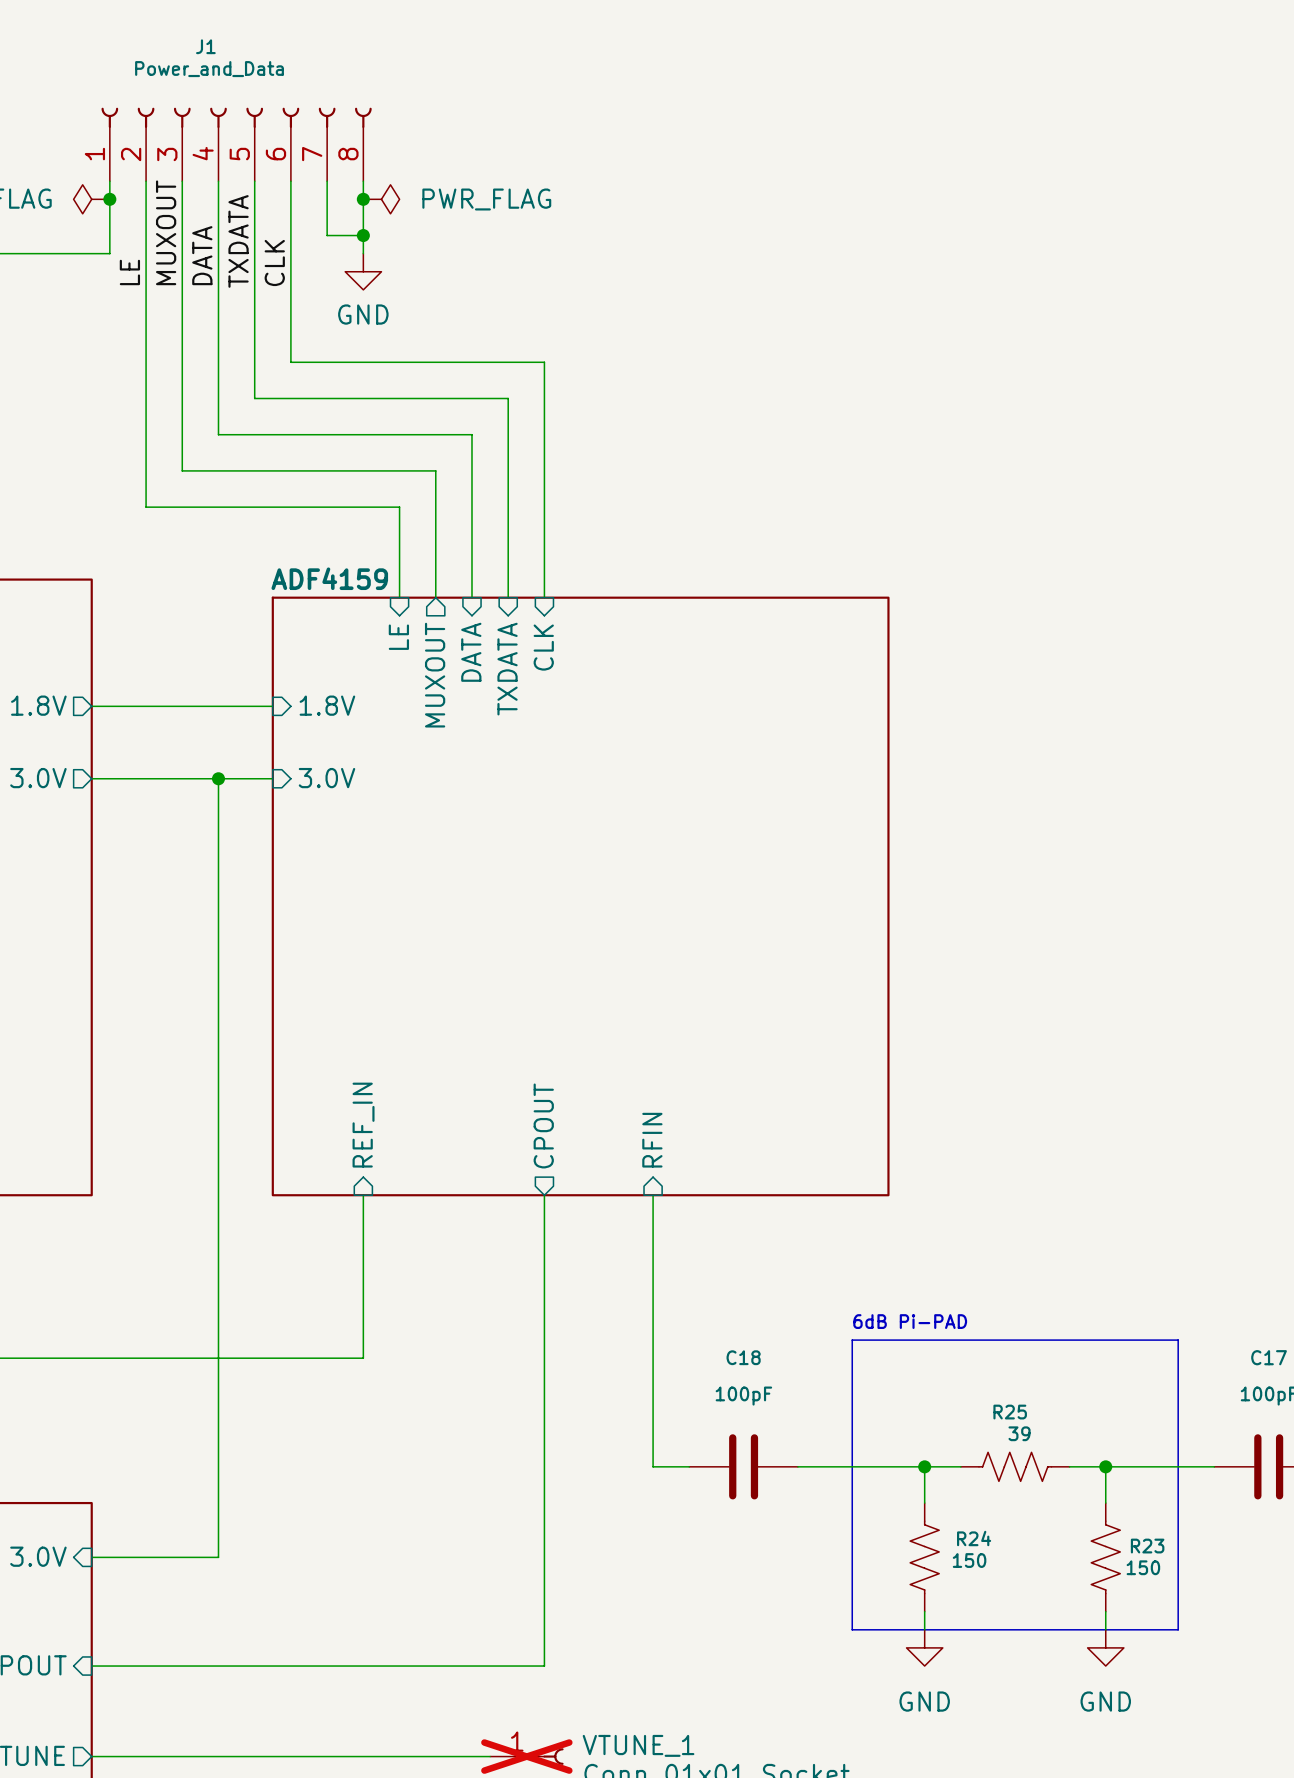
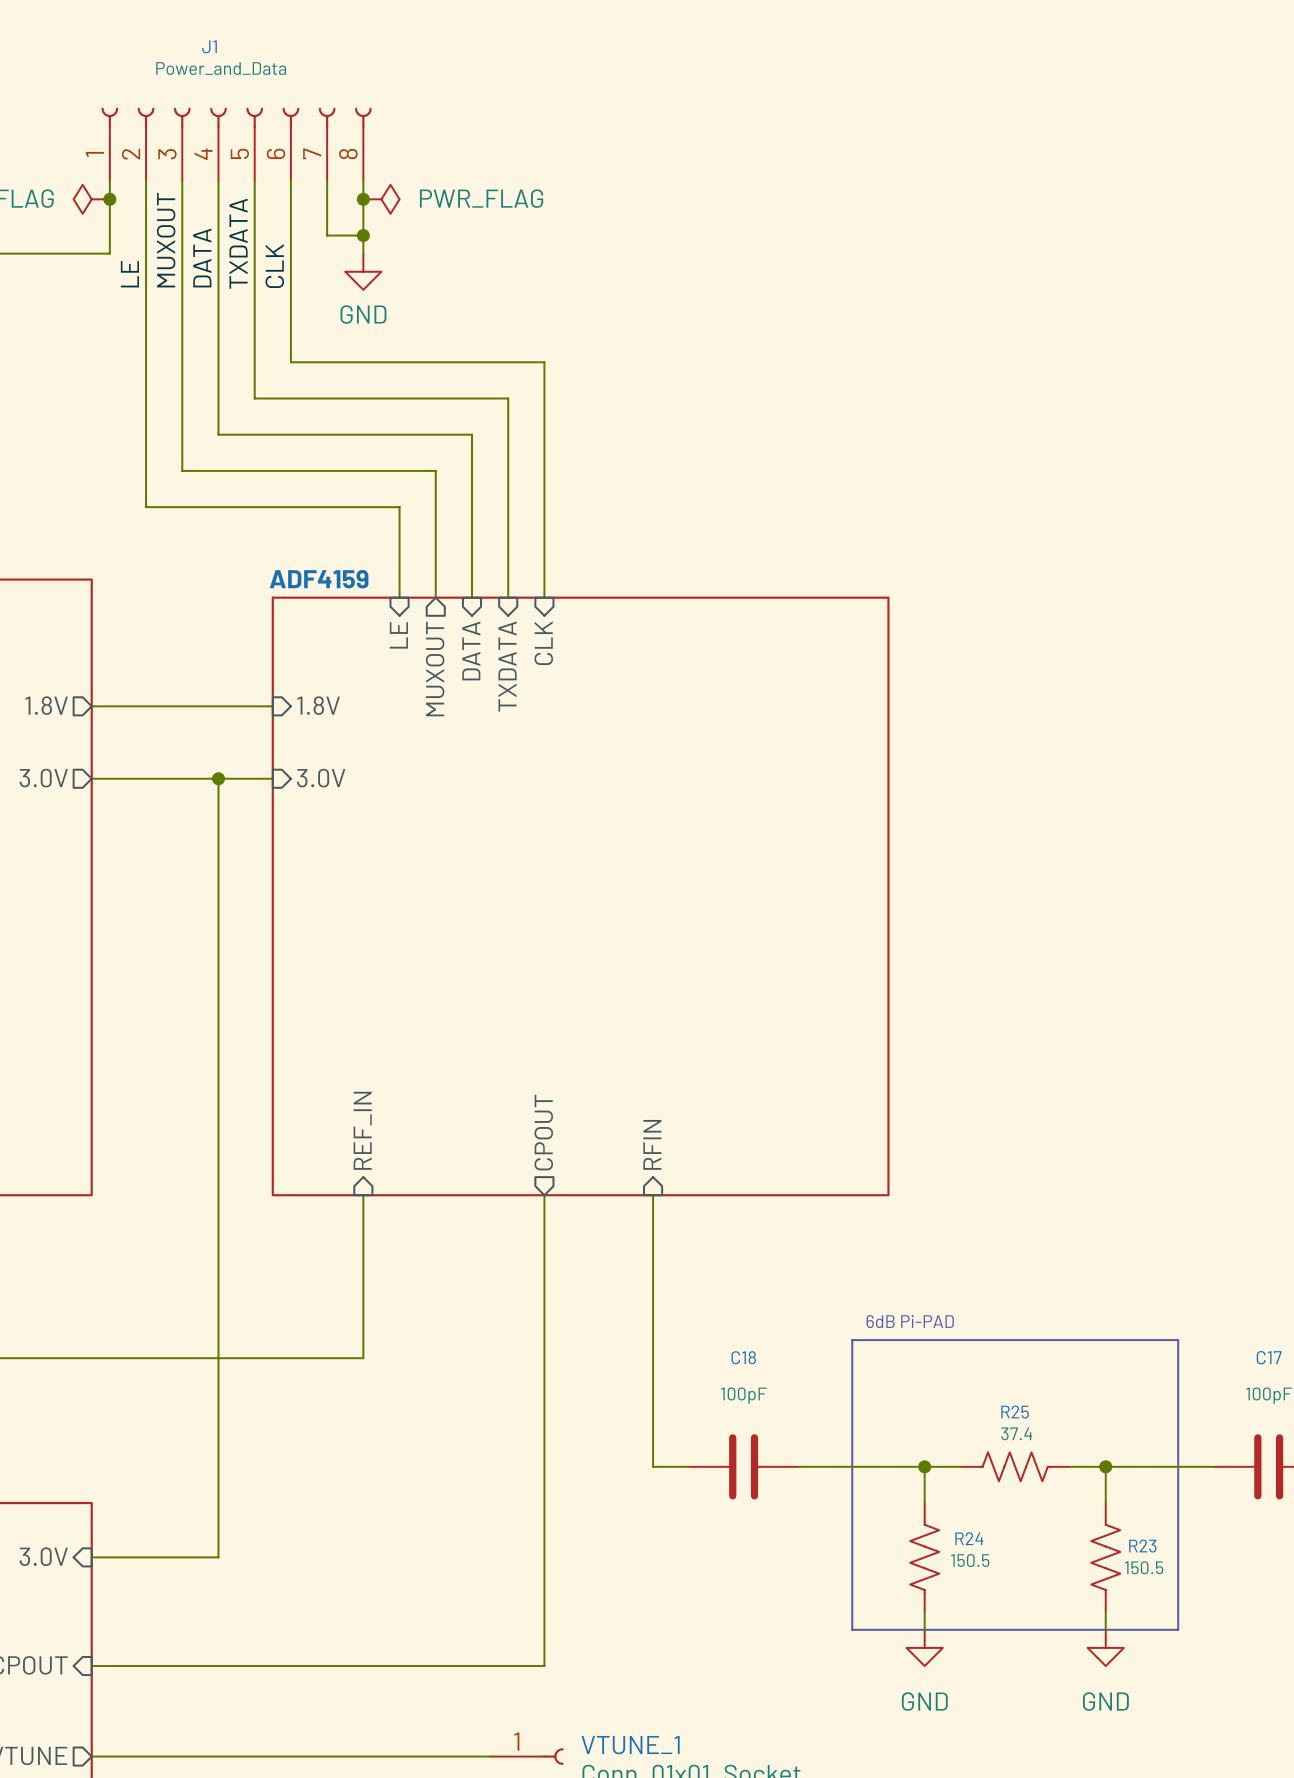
R25 value: 39 (1019, 1433) -> 37.4 (1016, 1433)
R24 value: 150 (969, 1560) -> 150.5 (970, 1560)
R23 value: 150 (1143, 1567) -> 150.5 (1144, 1567)
VTUNE_1 do-not-place cross: (526, 1756) -> none

